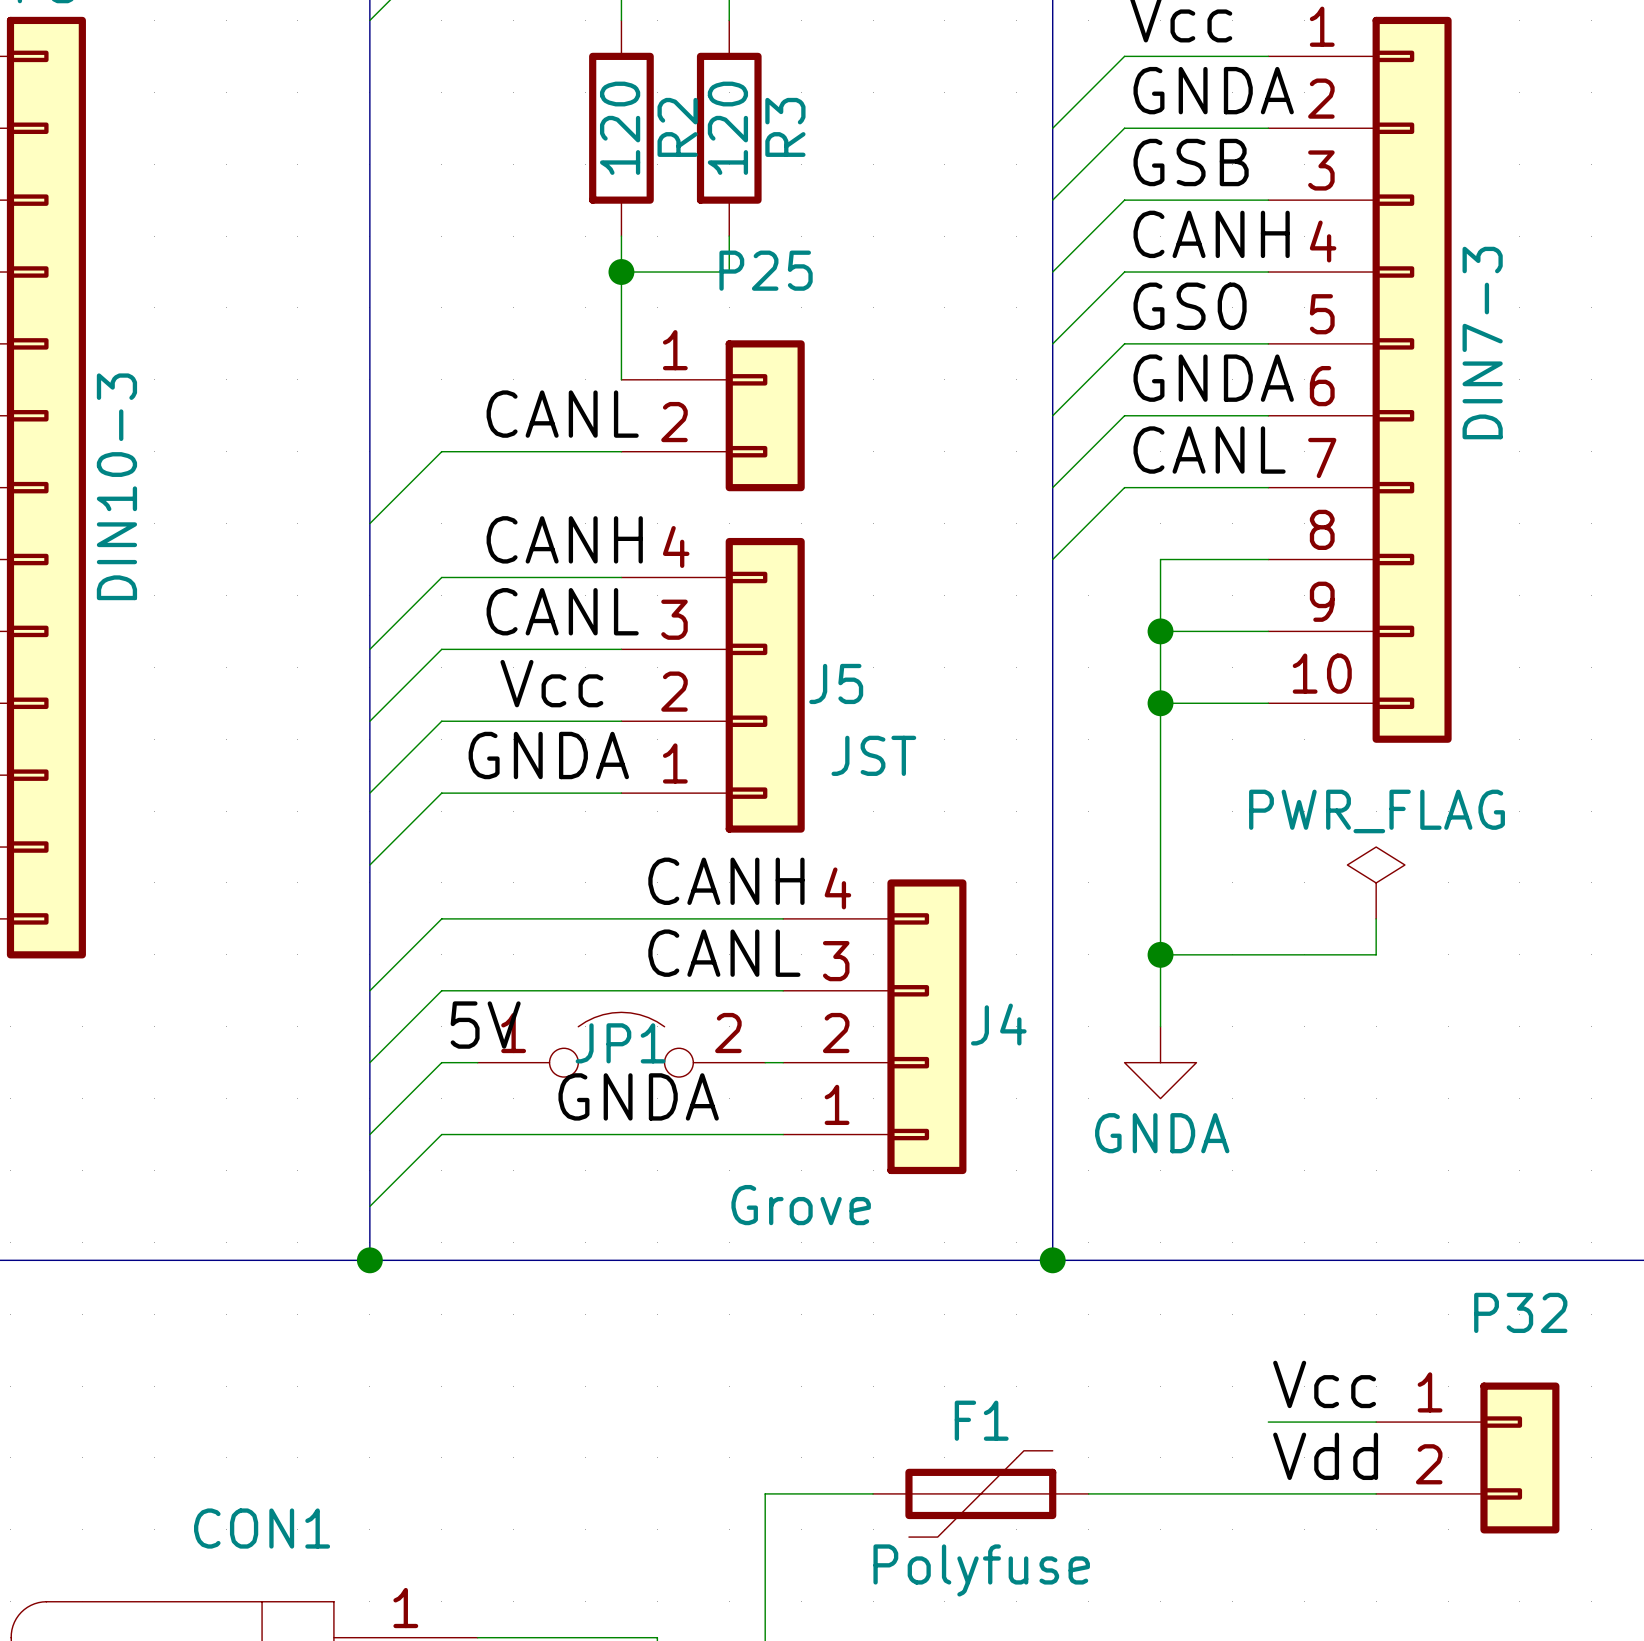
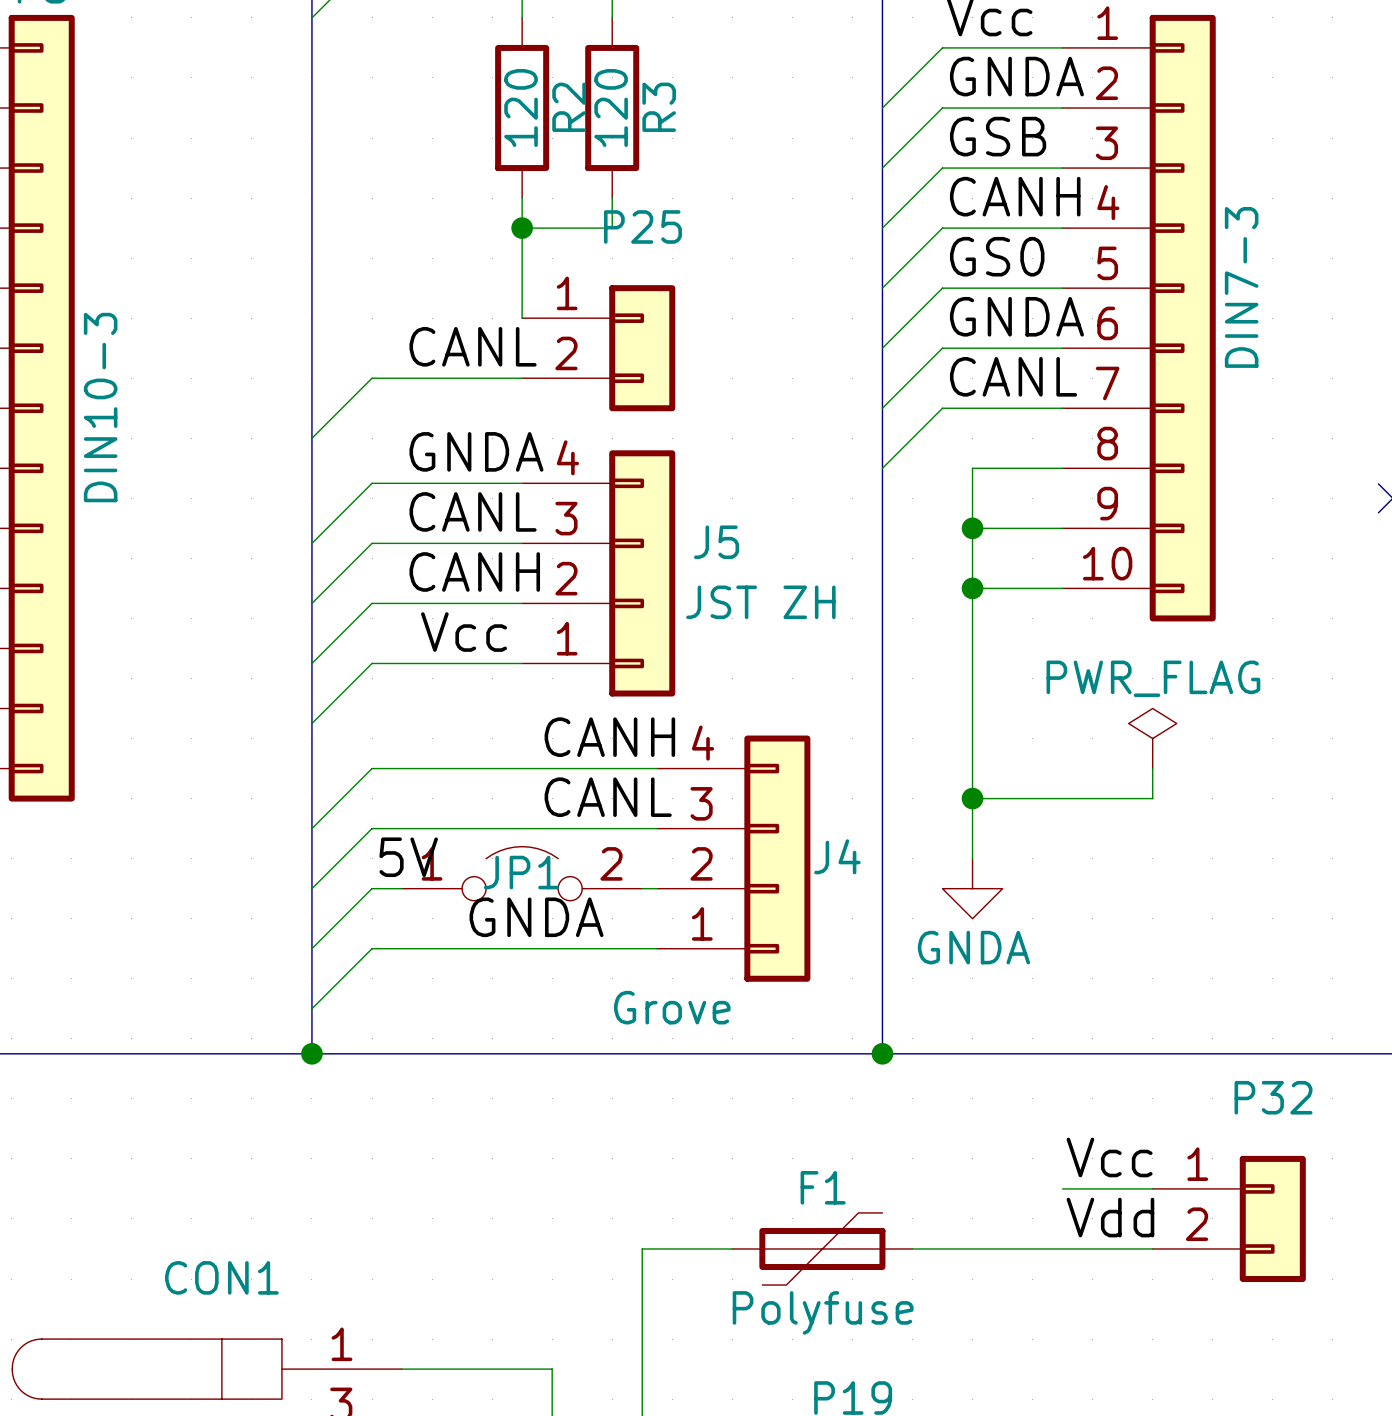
label: CANH (564, 539) -> GNDA (476, 451)
label: Vcc (551, 683) -> CANH (474, 571)
J5 name position: J5 (836, 683) -> J5 (716, 542)
label: GNDA (548, 755) -> none
label: none -> Vcc (464, 632)
J5 value: JST (873, 755) -> JST ZH (760, 602)

